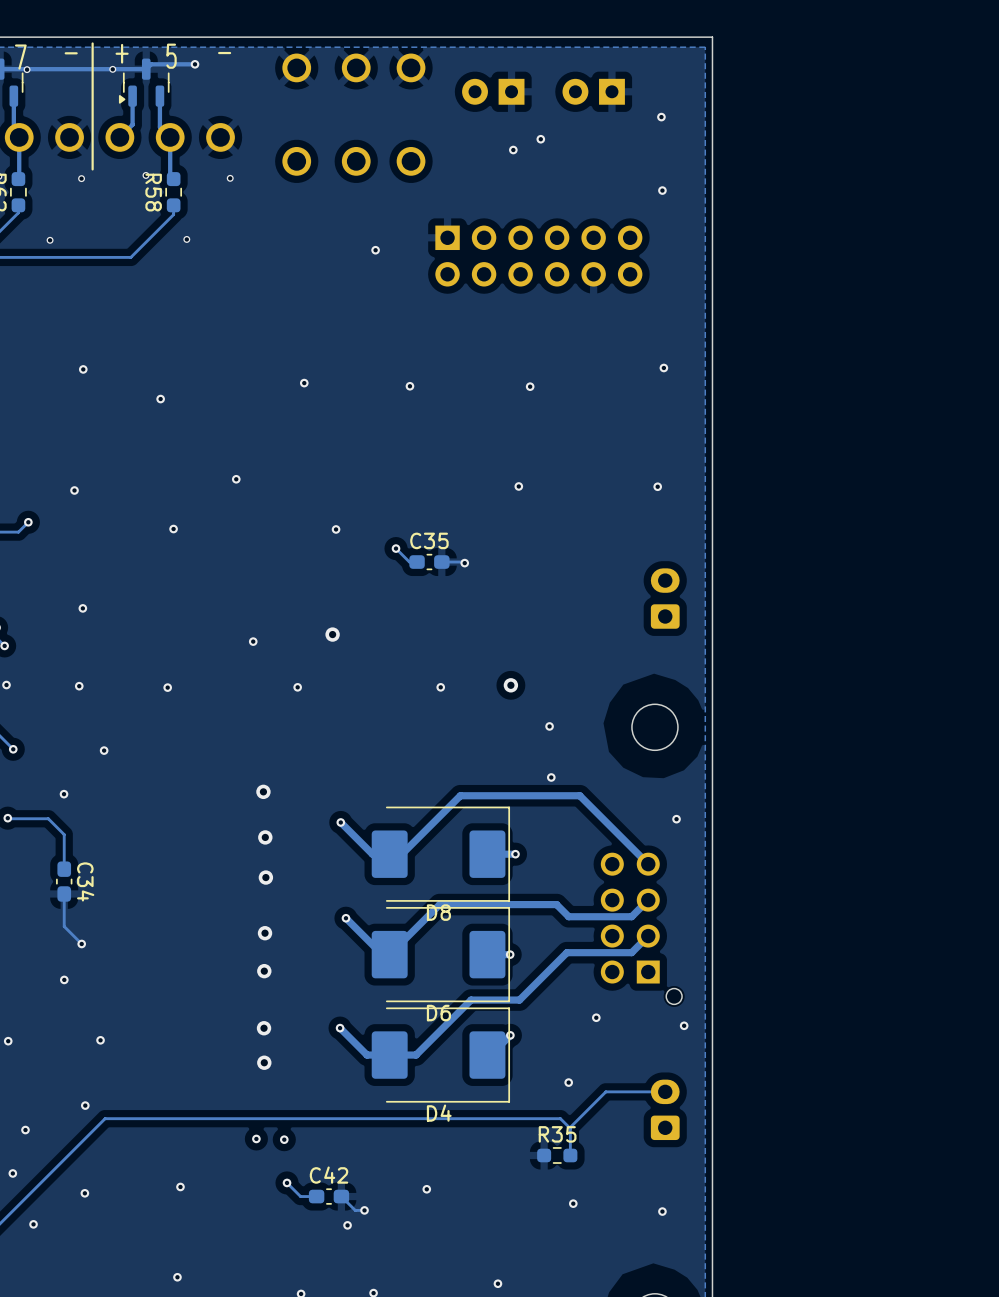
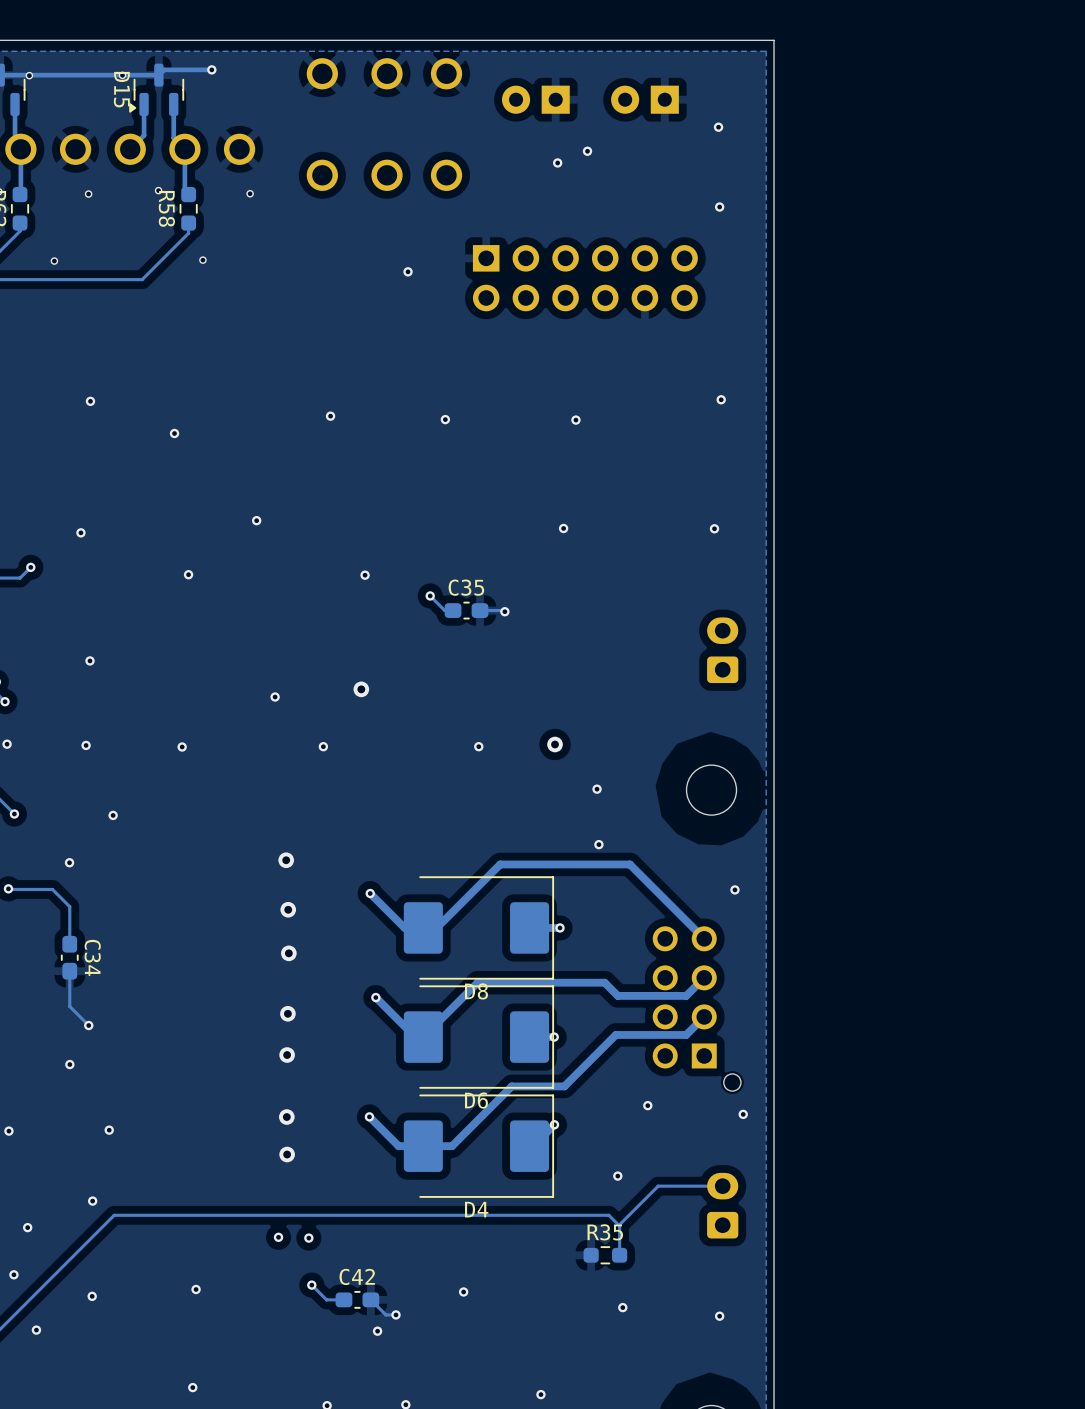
line: (92, 43) (92, 169) -> none
text: - (71, 53) -> none
text: + (122, 53) -> none
text: - (224, 53) -> none
text: 5 (171, 56) -> none
text: 7 (20, 57) -> none
D15 name: none -> D15 (121, 89)

